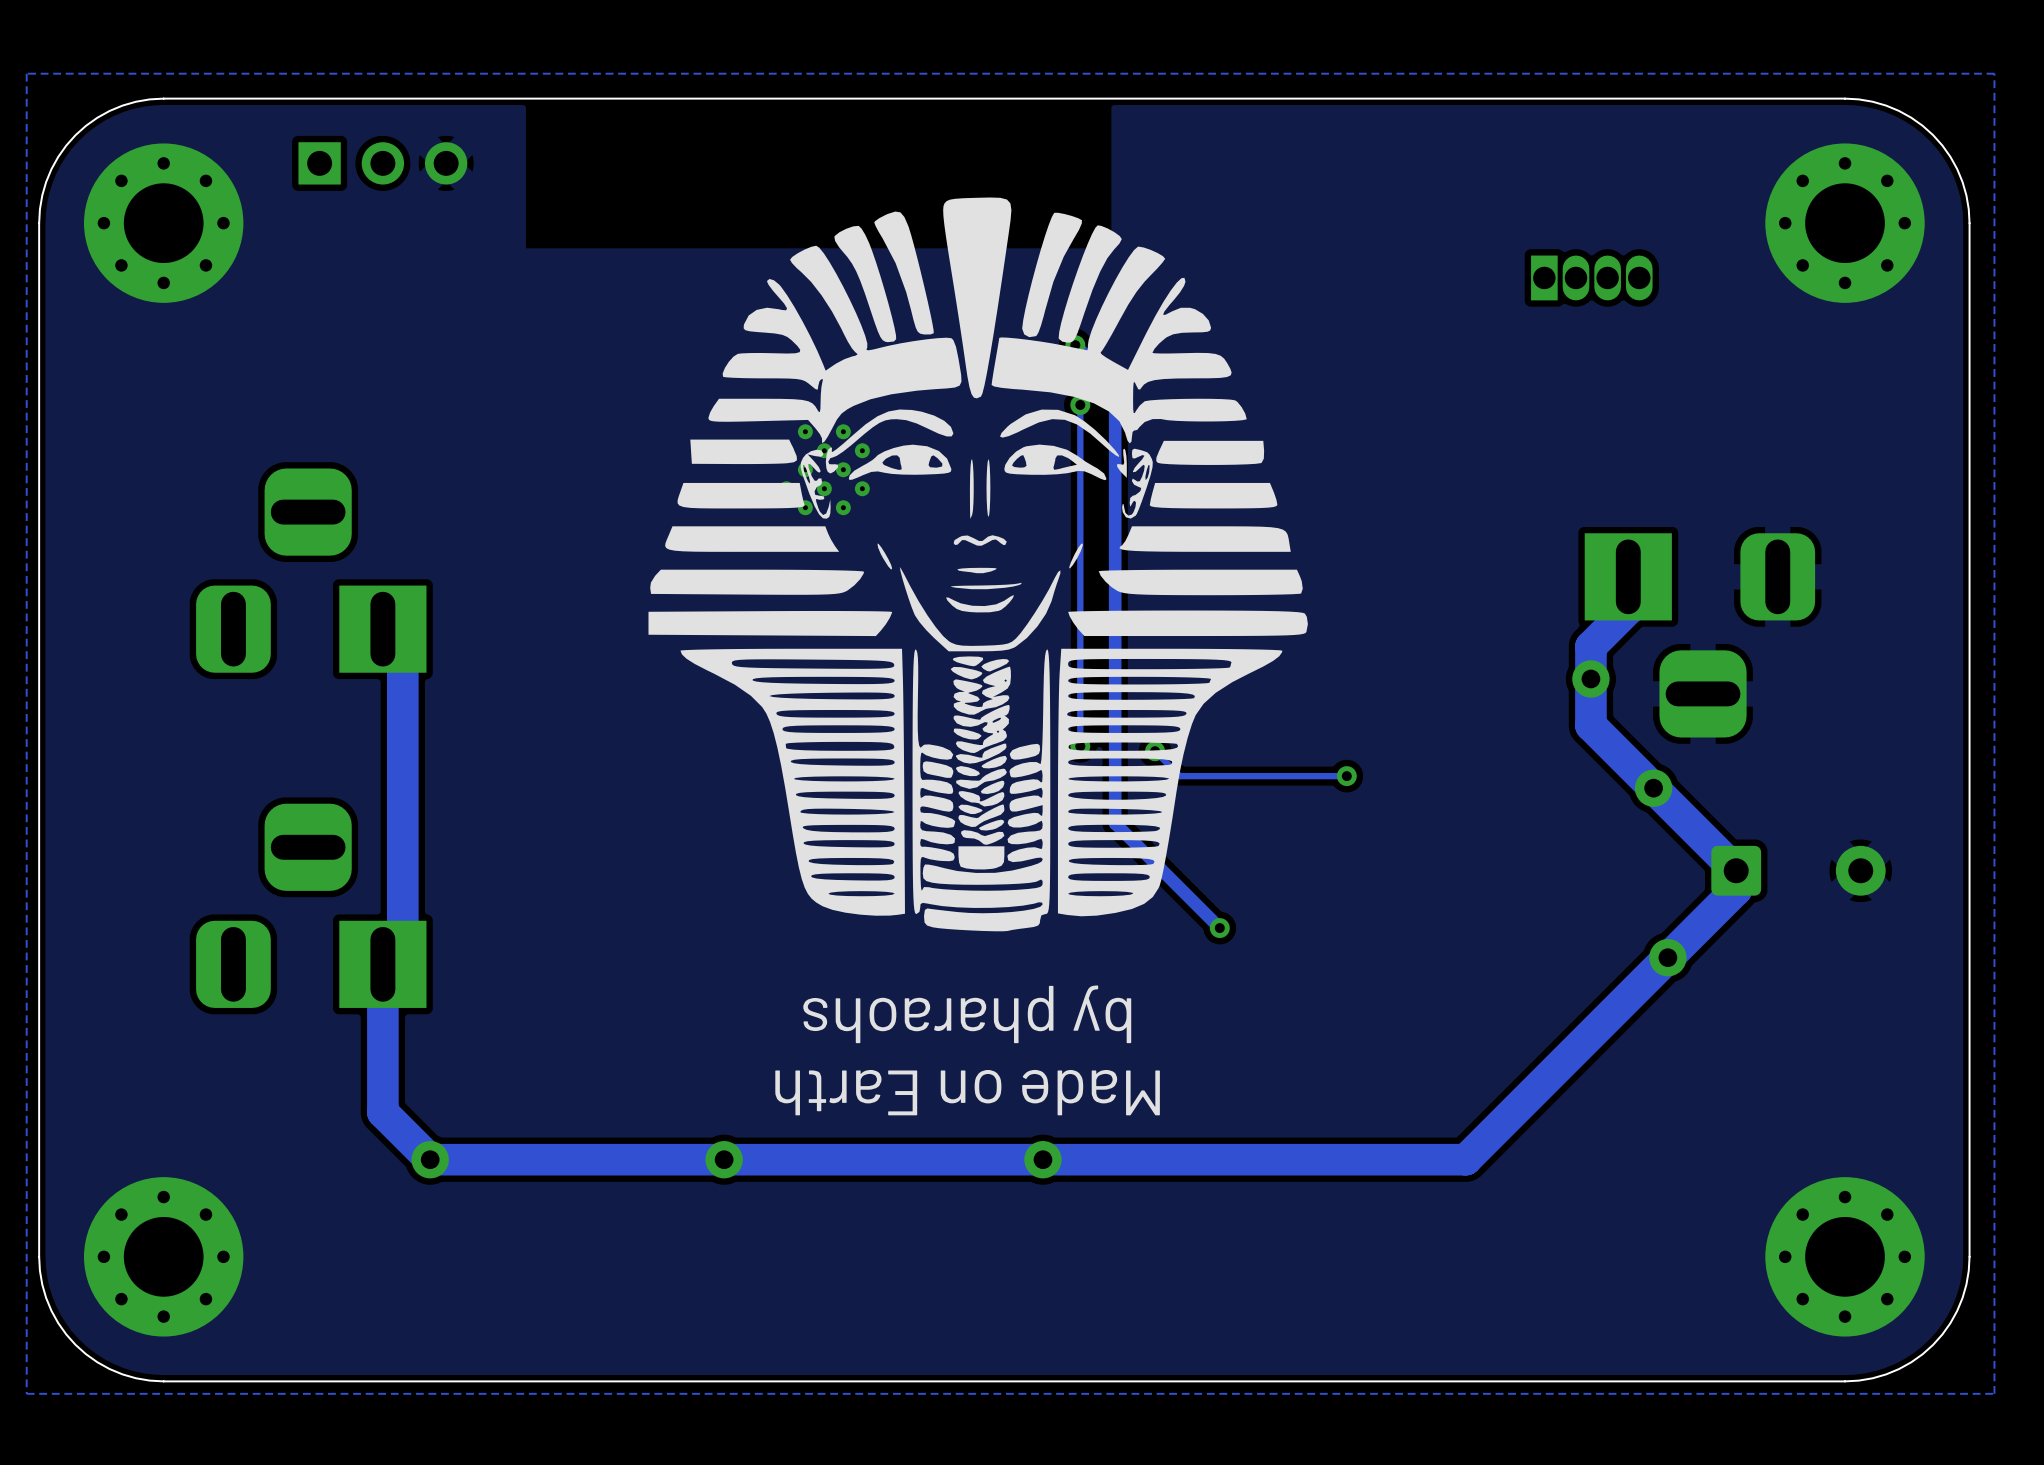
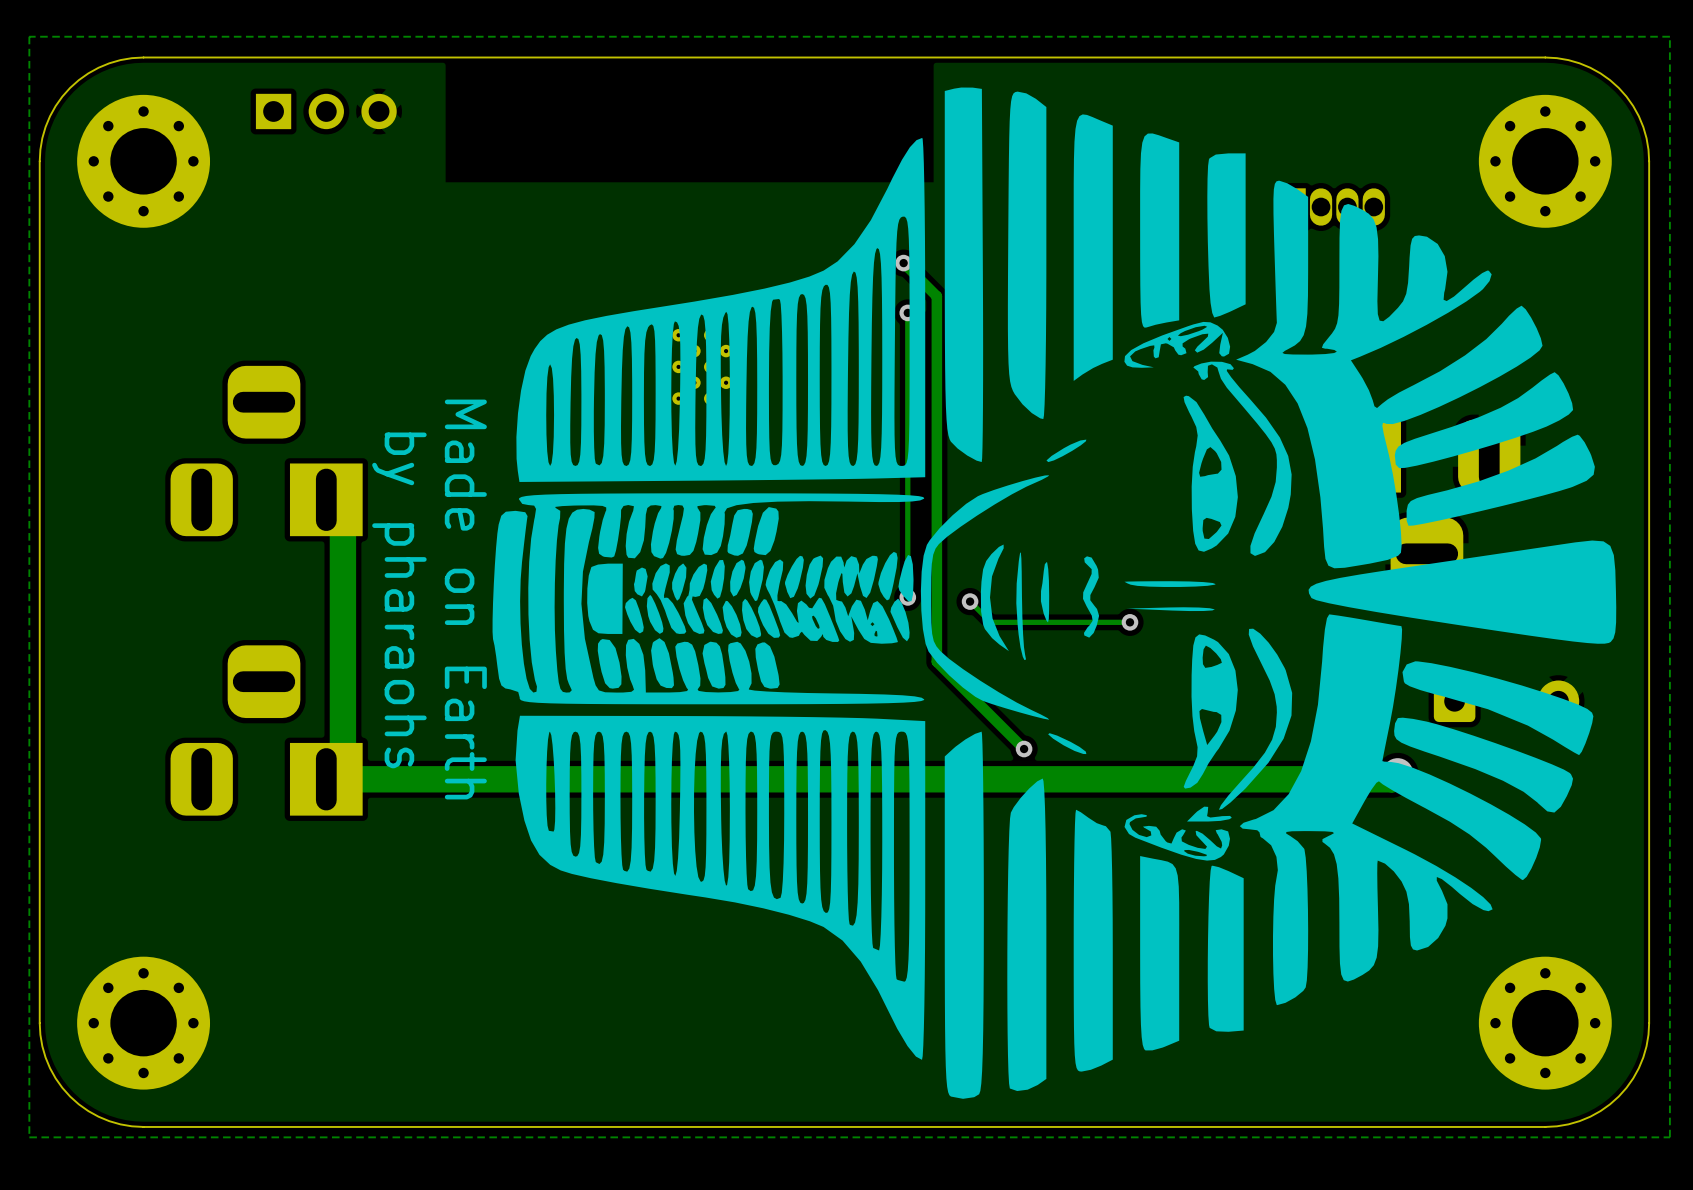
drawing: none -> [492, 87, 1617, 1099]
drawing: [648, 197, 1308, 932] -> none
track: (1628, 576) (1628, 609) (1590, 646) (1590, 725) (1736, 870) (1736, 889) (1668, 957) -> none
via: (1590, 678) -> none
via: (1653, 788) -> none
track: (1661, 964) (1465, 1159) (430, 1159) (382, 1112) (382, 964) -> (1392, 779) (326, 779)
text rotation: 0° (967, 1014) -> 90° counterclockwise (399, 600)
text position: by pharaohs (967, 1014) -> by pharaohs (399, 600)
text rotation: 0° (967, 1092) -> 90° counterclockwise (465, 599)
via: (430, 1159) -> none
via: (724, 1159) -> none
via: (1042, 1159) -> none

